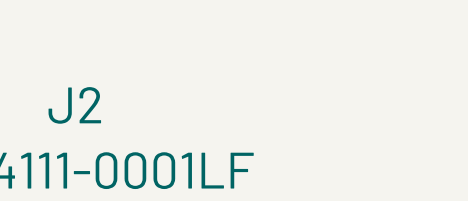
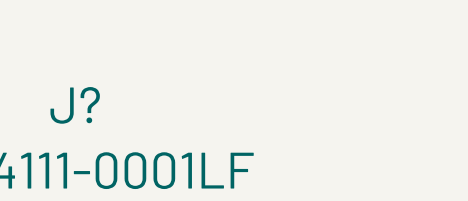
J2 name: J2 (74, 105) -> J? (75, 105)

